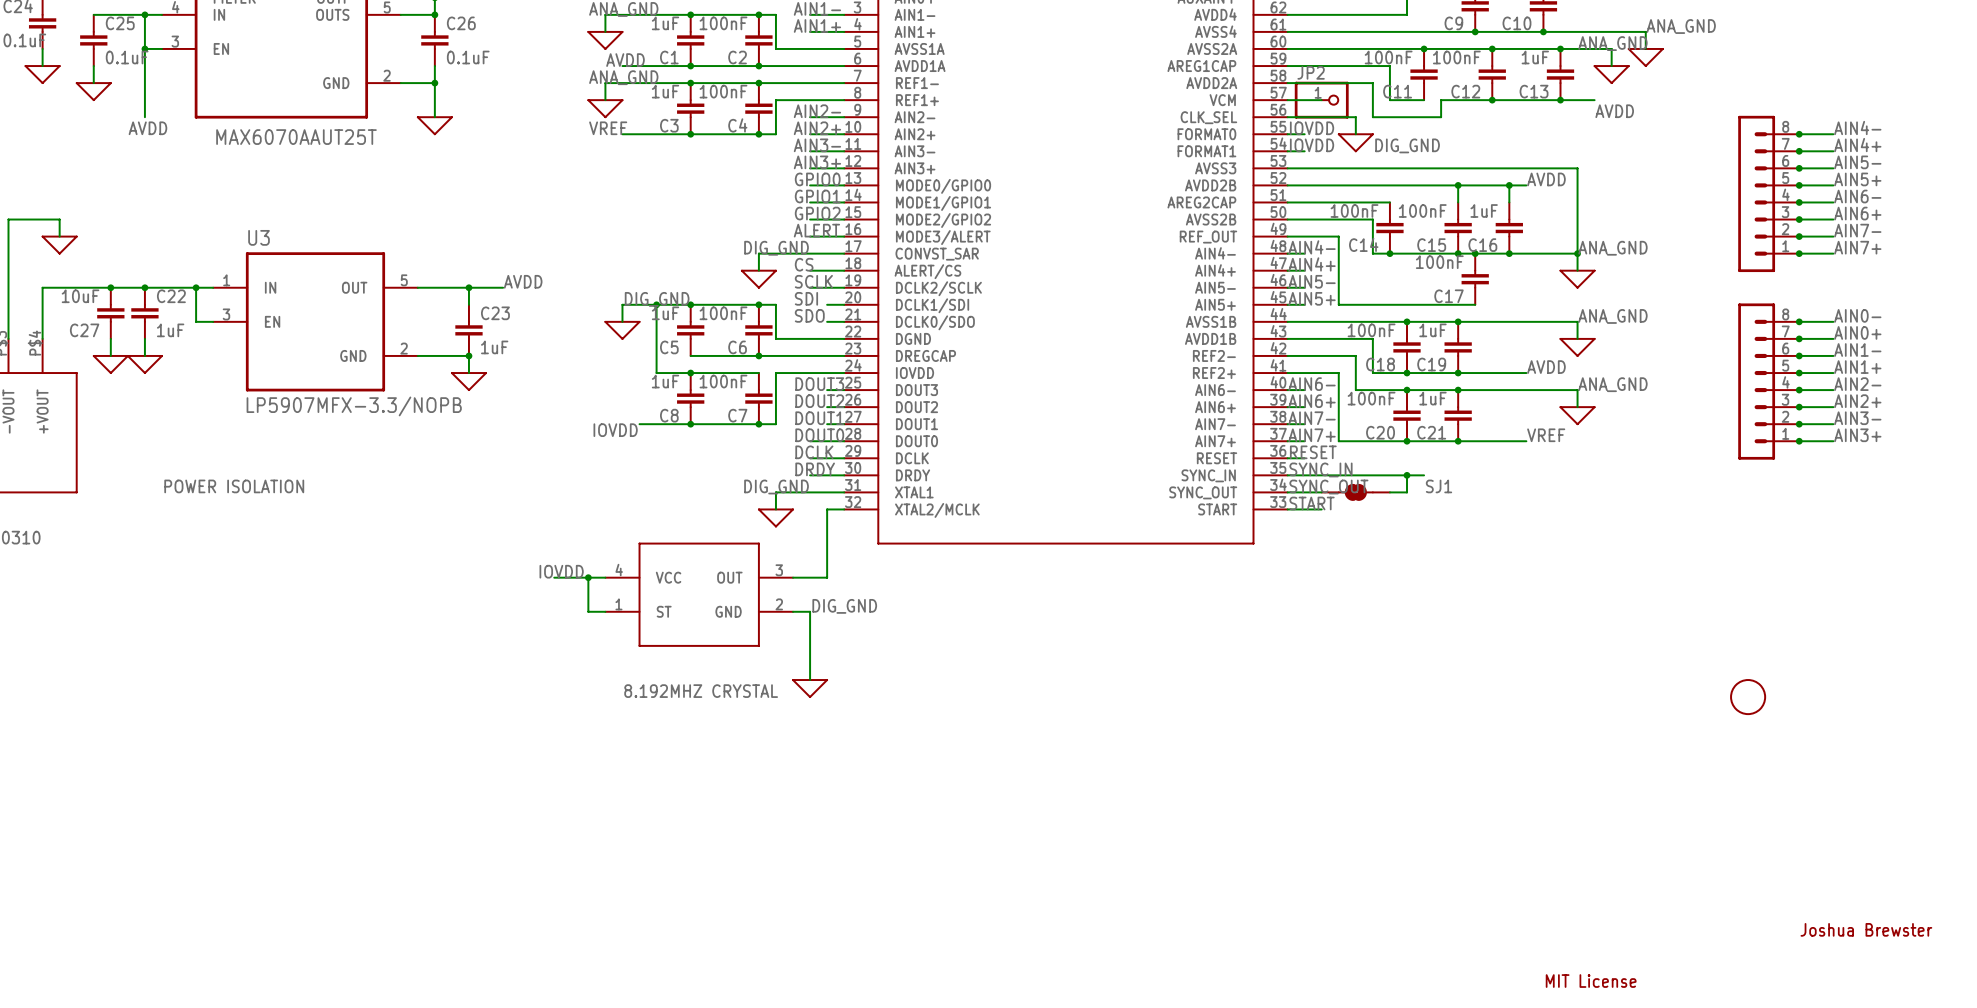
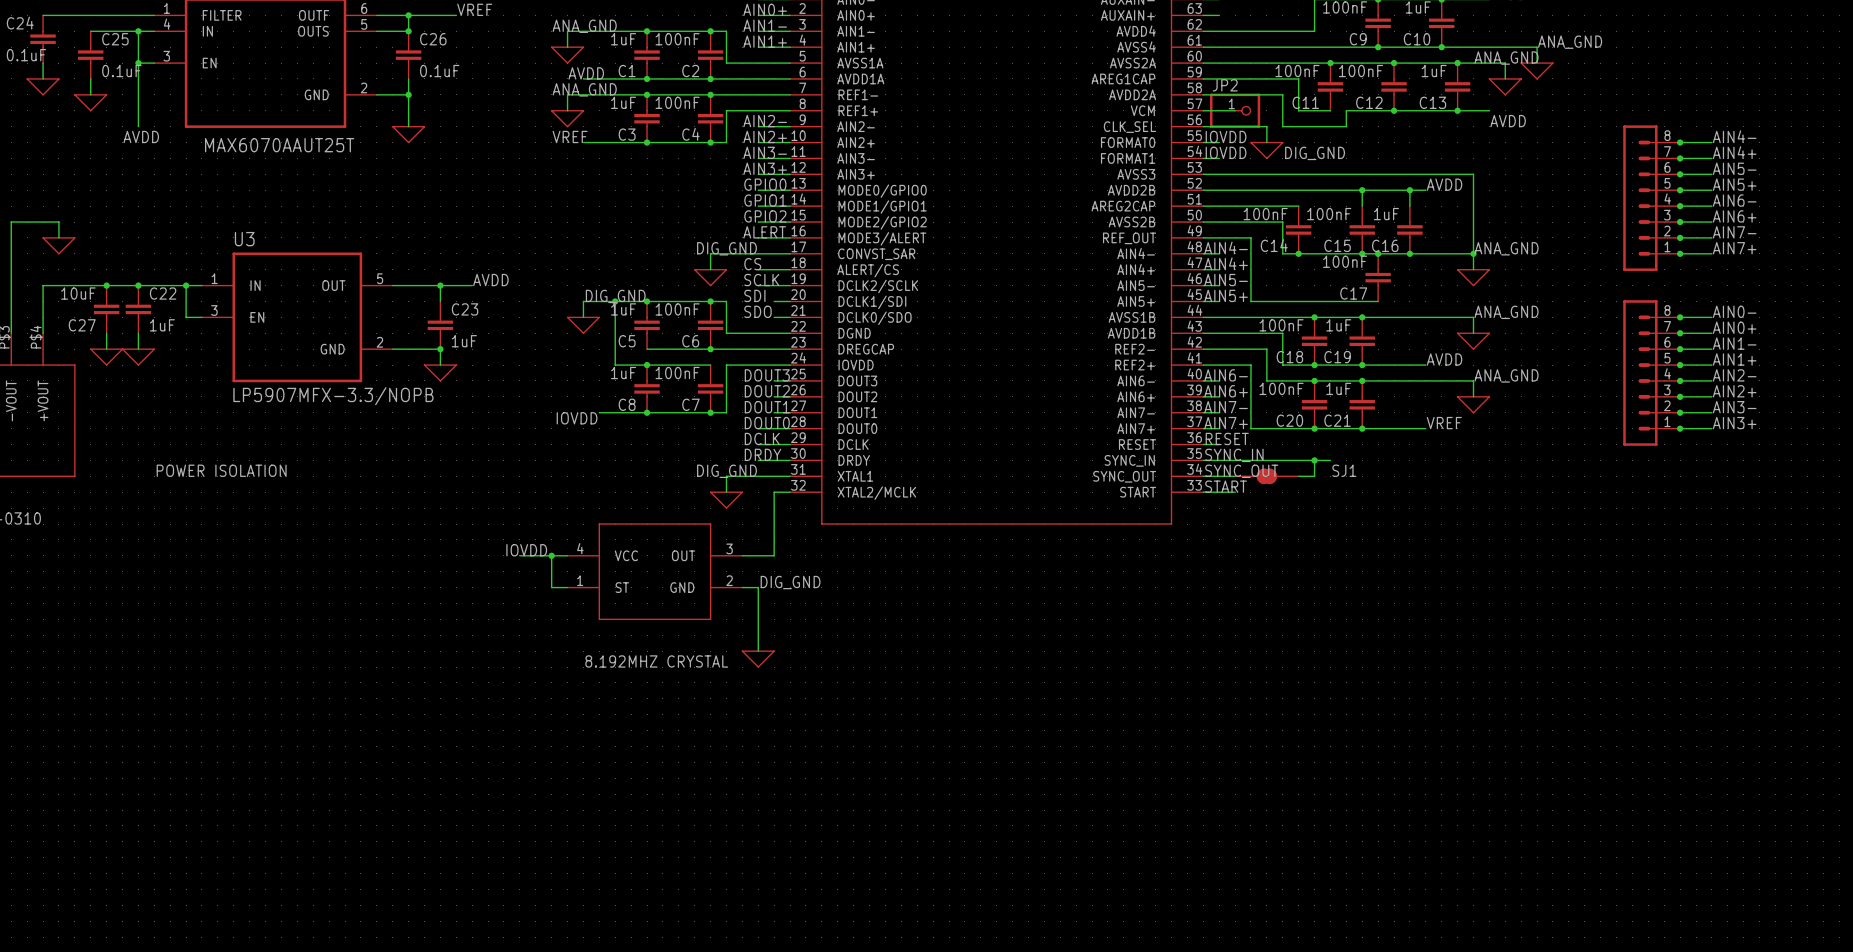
part: (1748, 697) -> none
text: Joshua Brewster (1866, 929) -> none
text: MIT License (1591, 981) -> none

